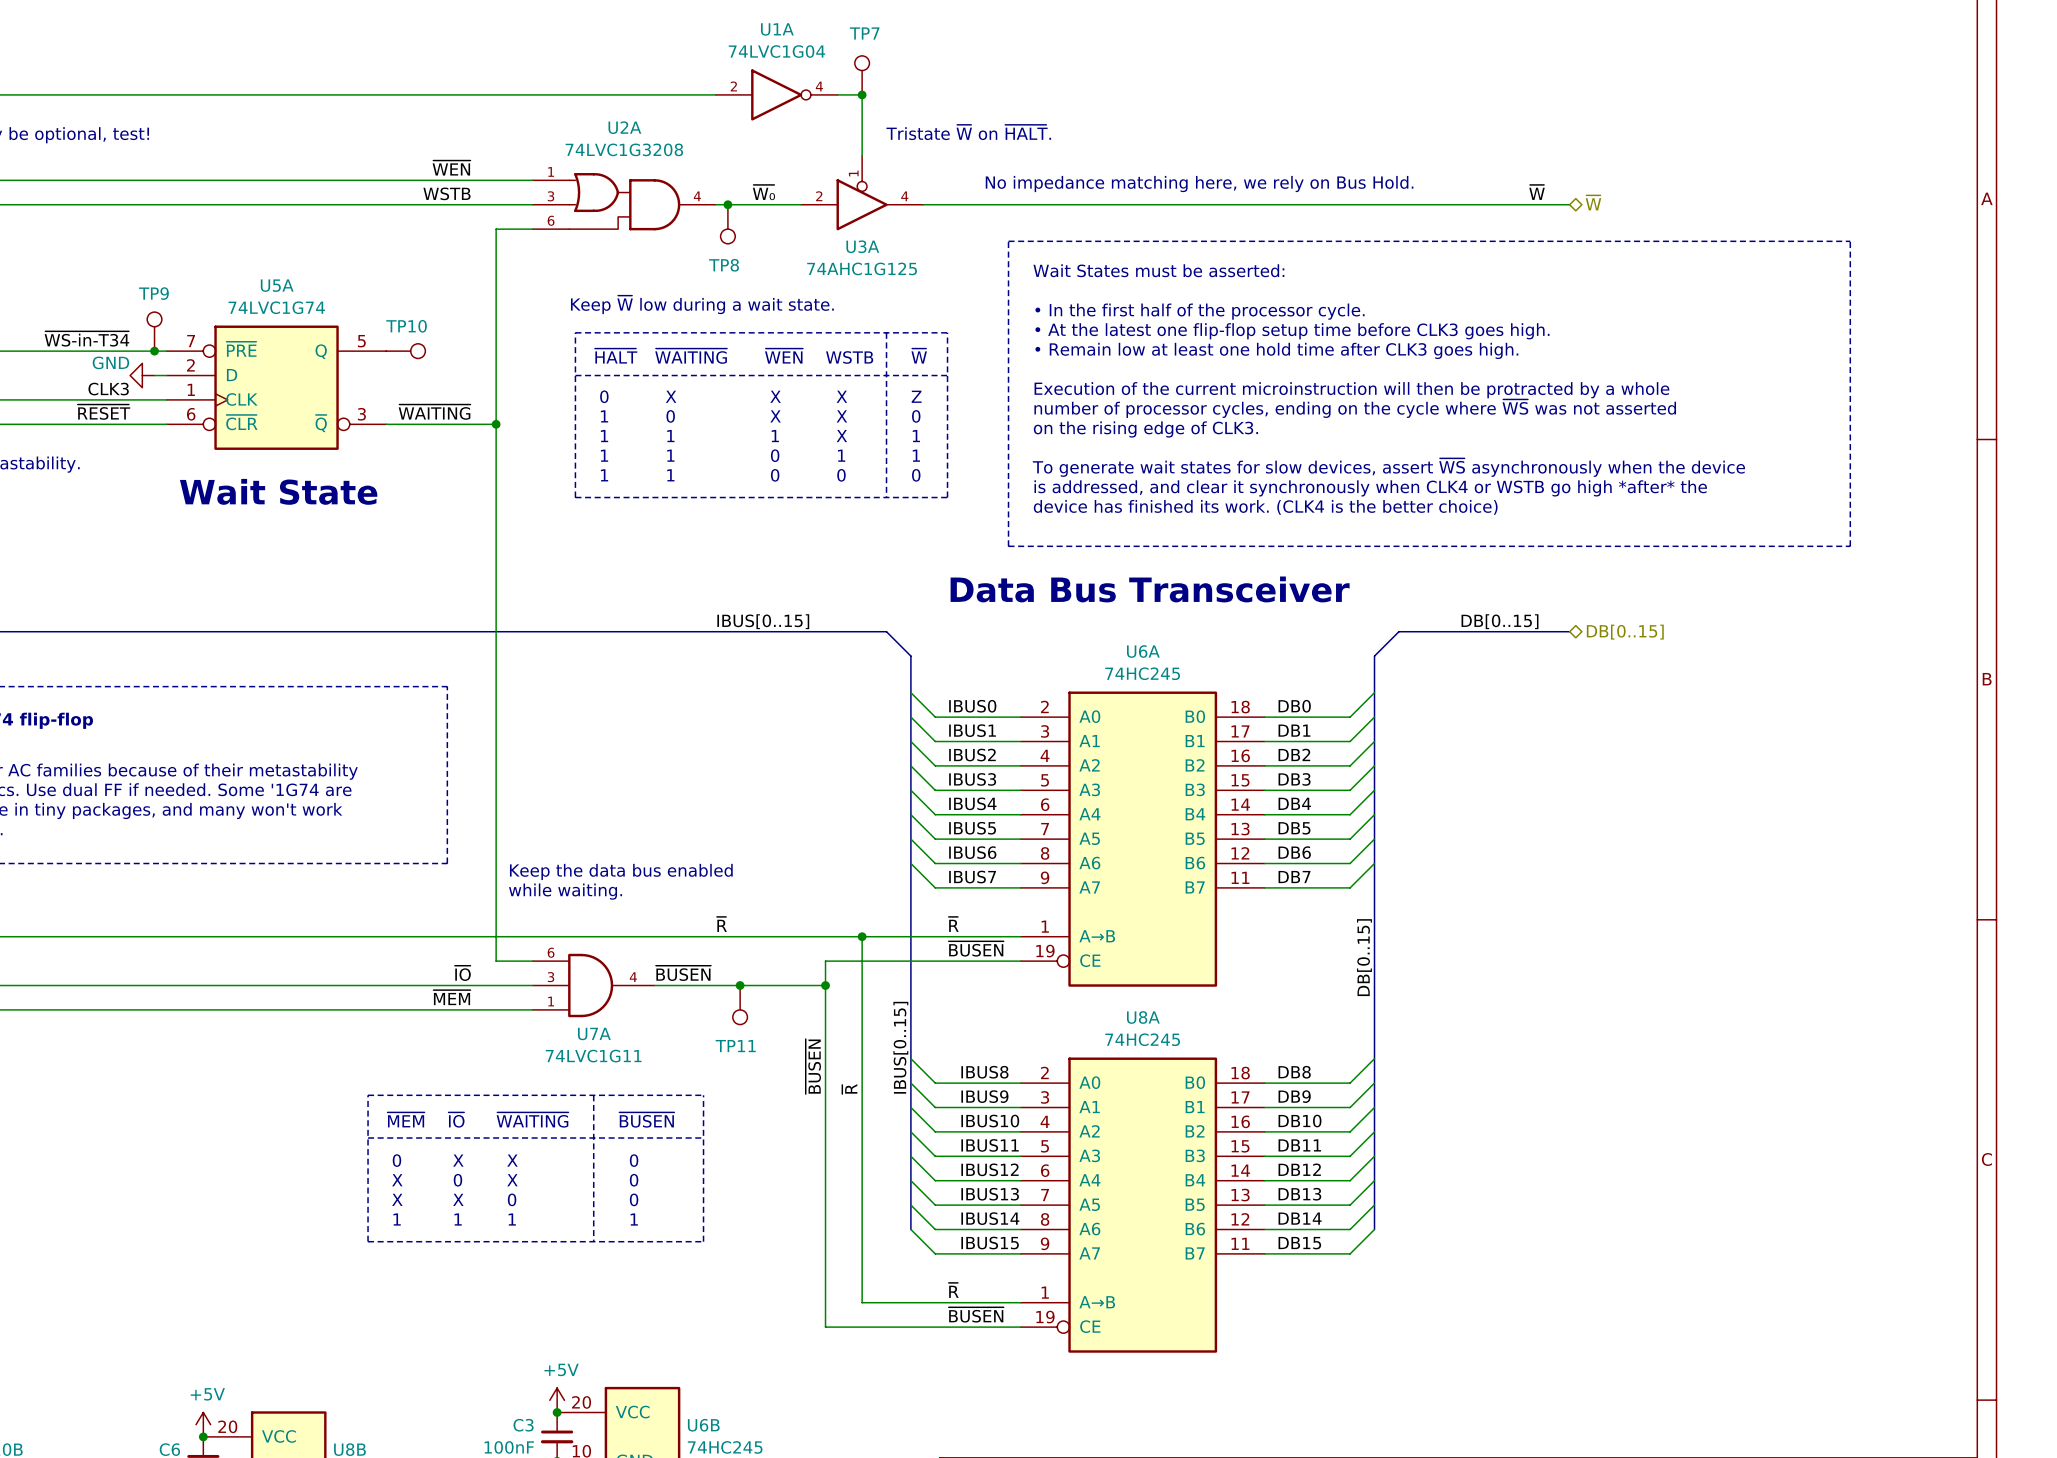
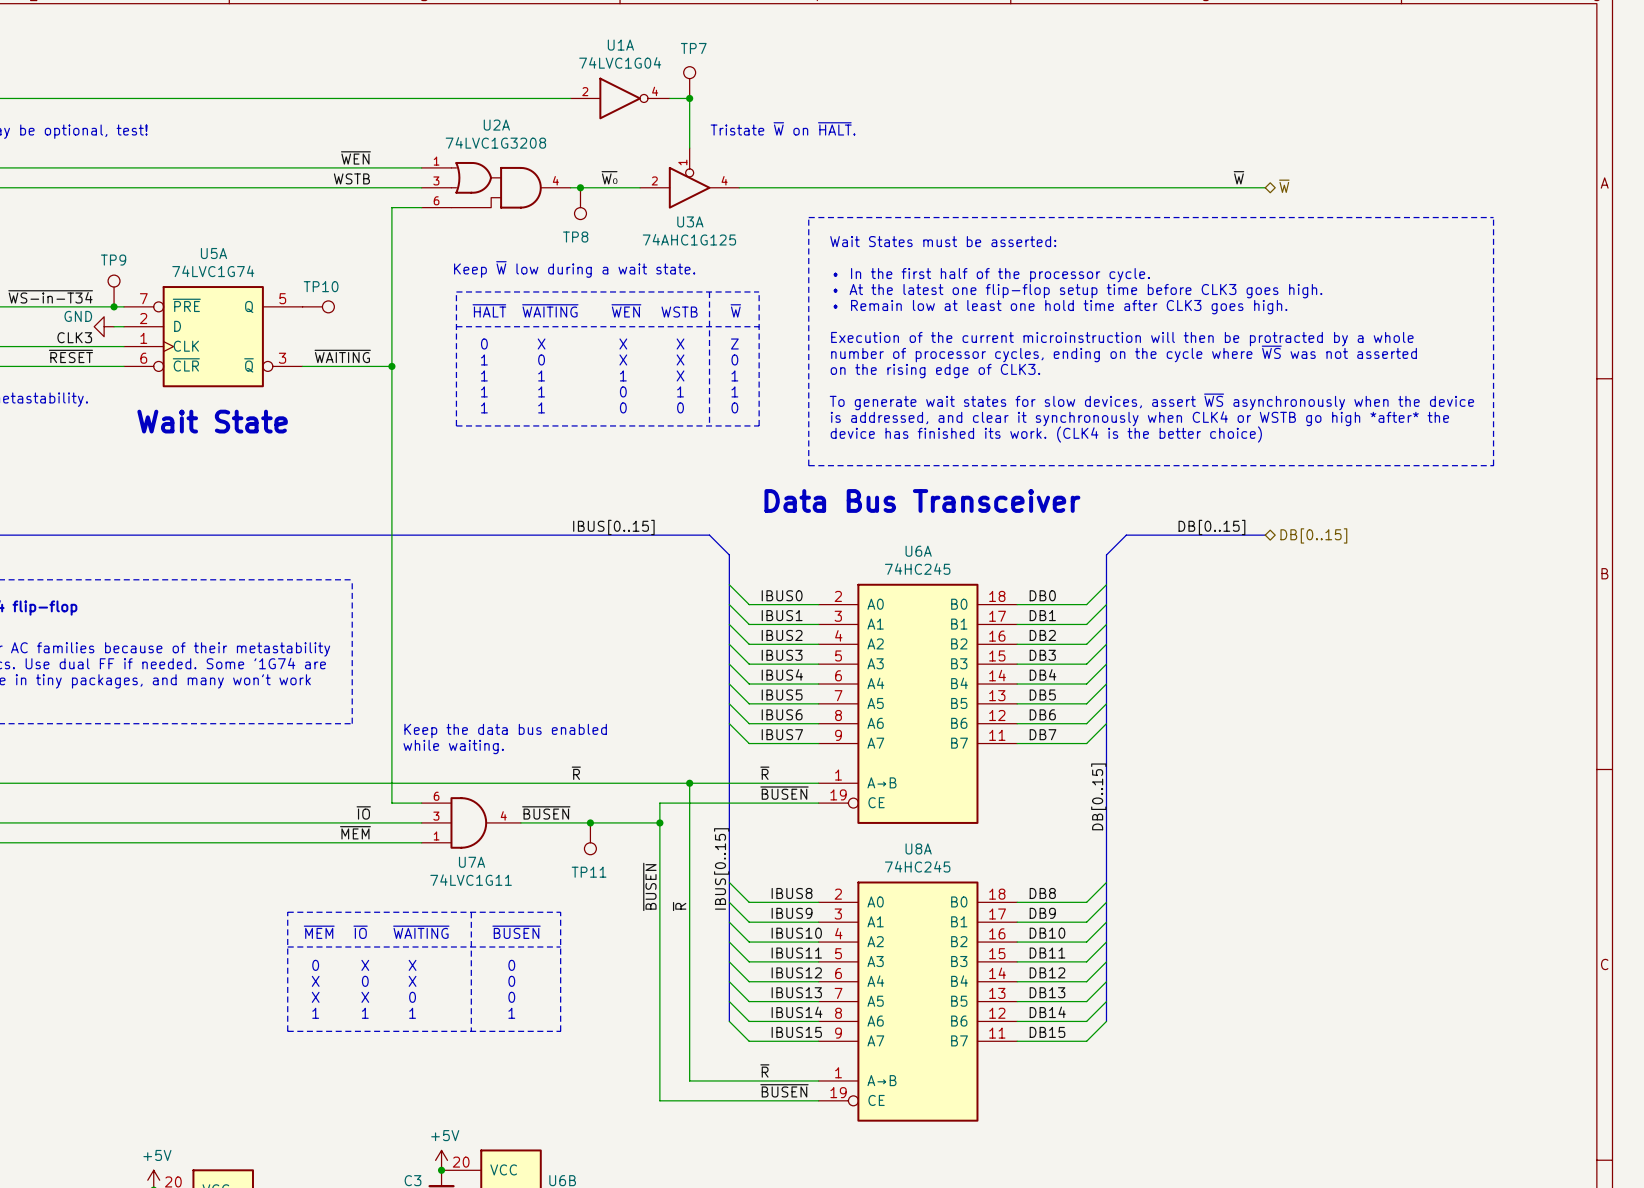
text: No impedance matching here, we rely on Bus Hold. (1199, 184) -> none

